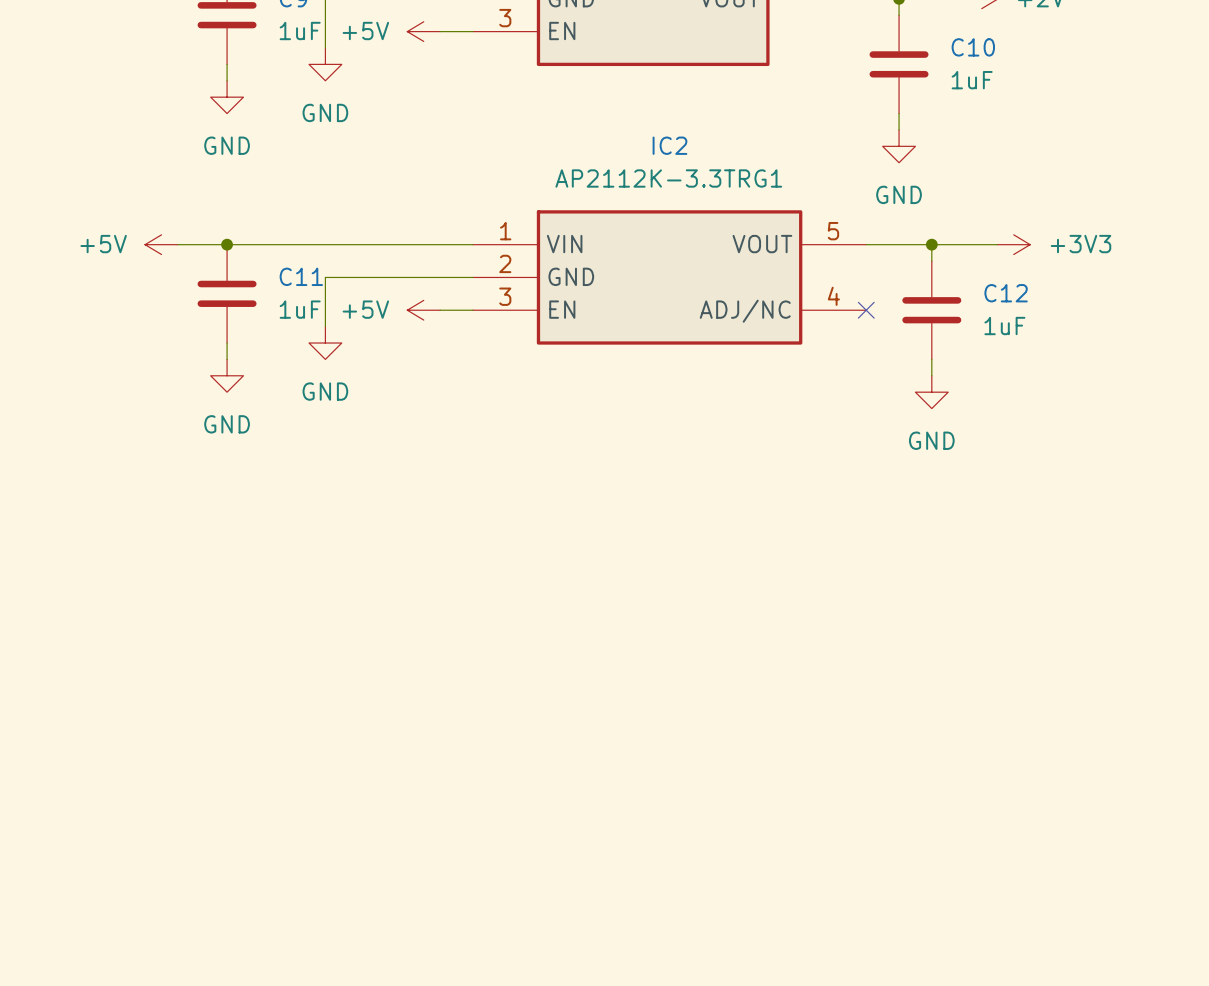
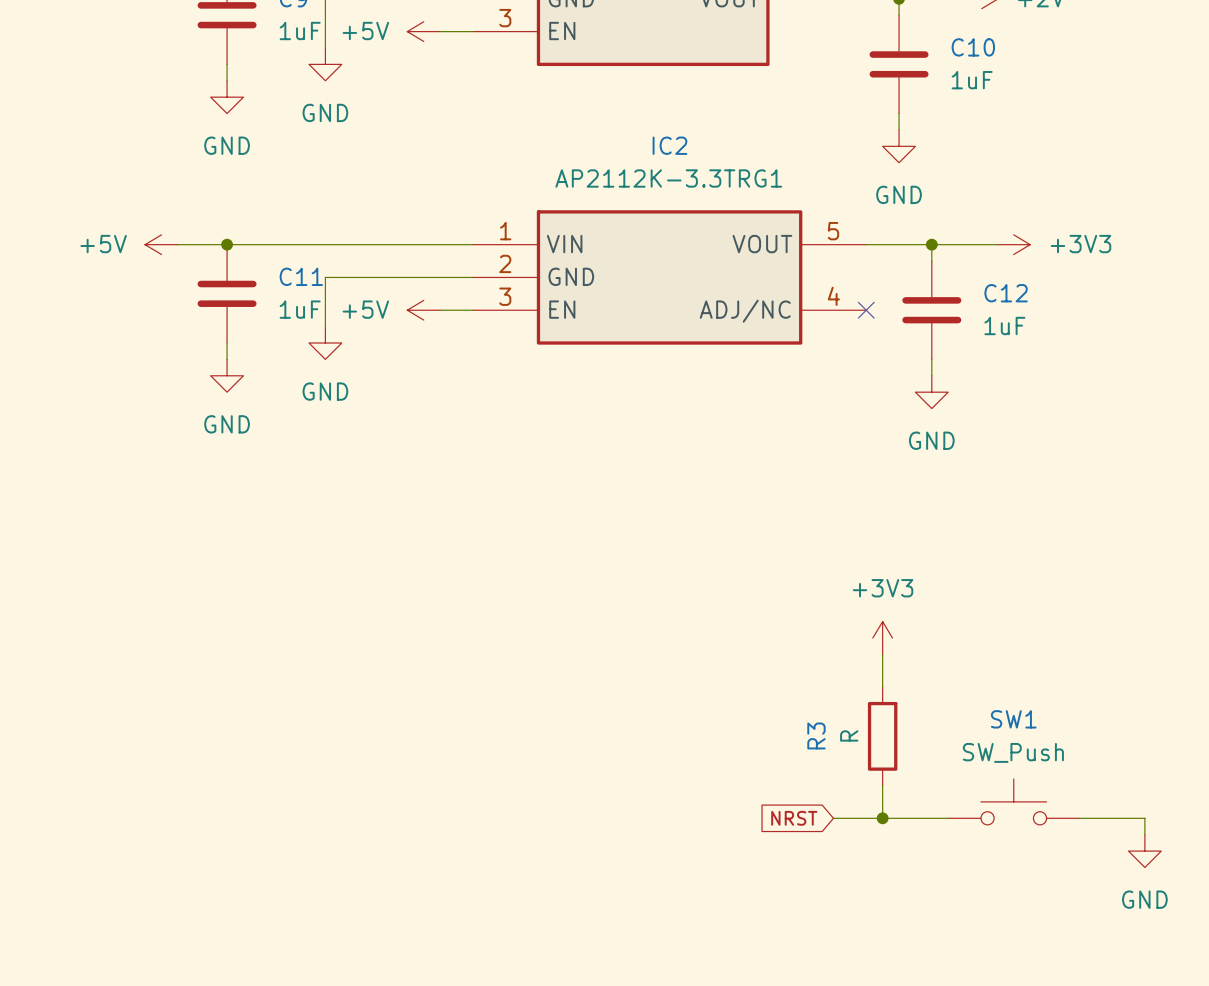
power symbol: none -> +3V3 (882, 638)
wire: none -> (882, 654) (882, 687)
R3: none -> R (882, 736)
wire: none -> (882, 785) (882, 818)
SW1: none -> SW_Push (1013, 801)
global label: none -> NRST (794, 818)
wire: none -> (833, 818) (948, 818)
junction: none -> (882, 818)
wire: none -> (1079, 818) (1144, 818) (1144, 834)
power symbol: none -> GND (1144, 851)

